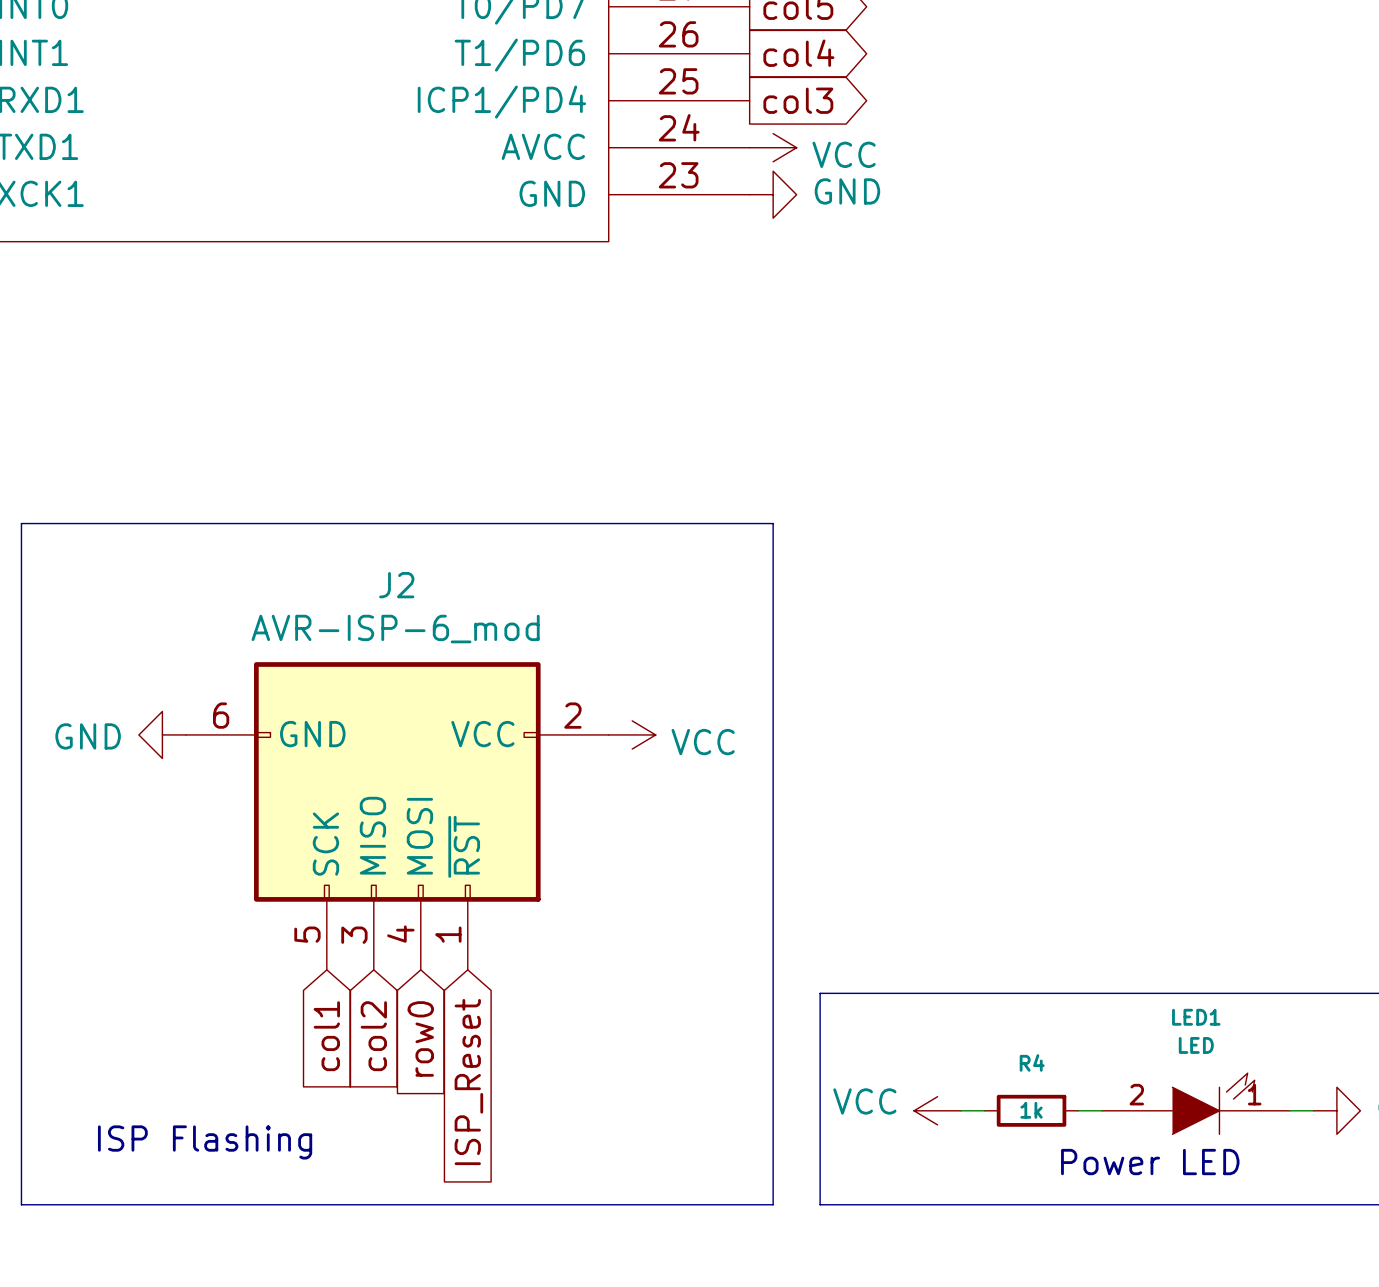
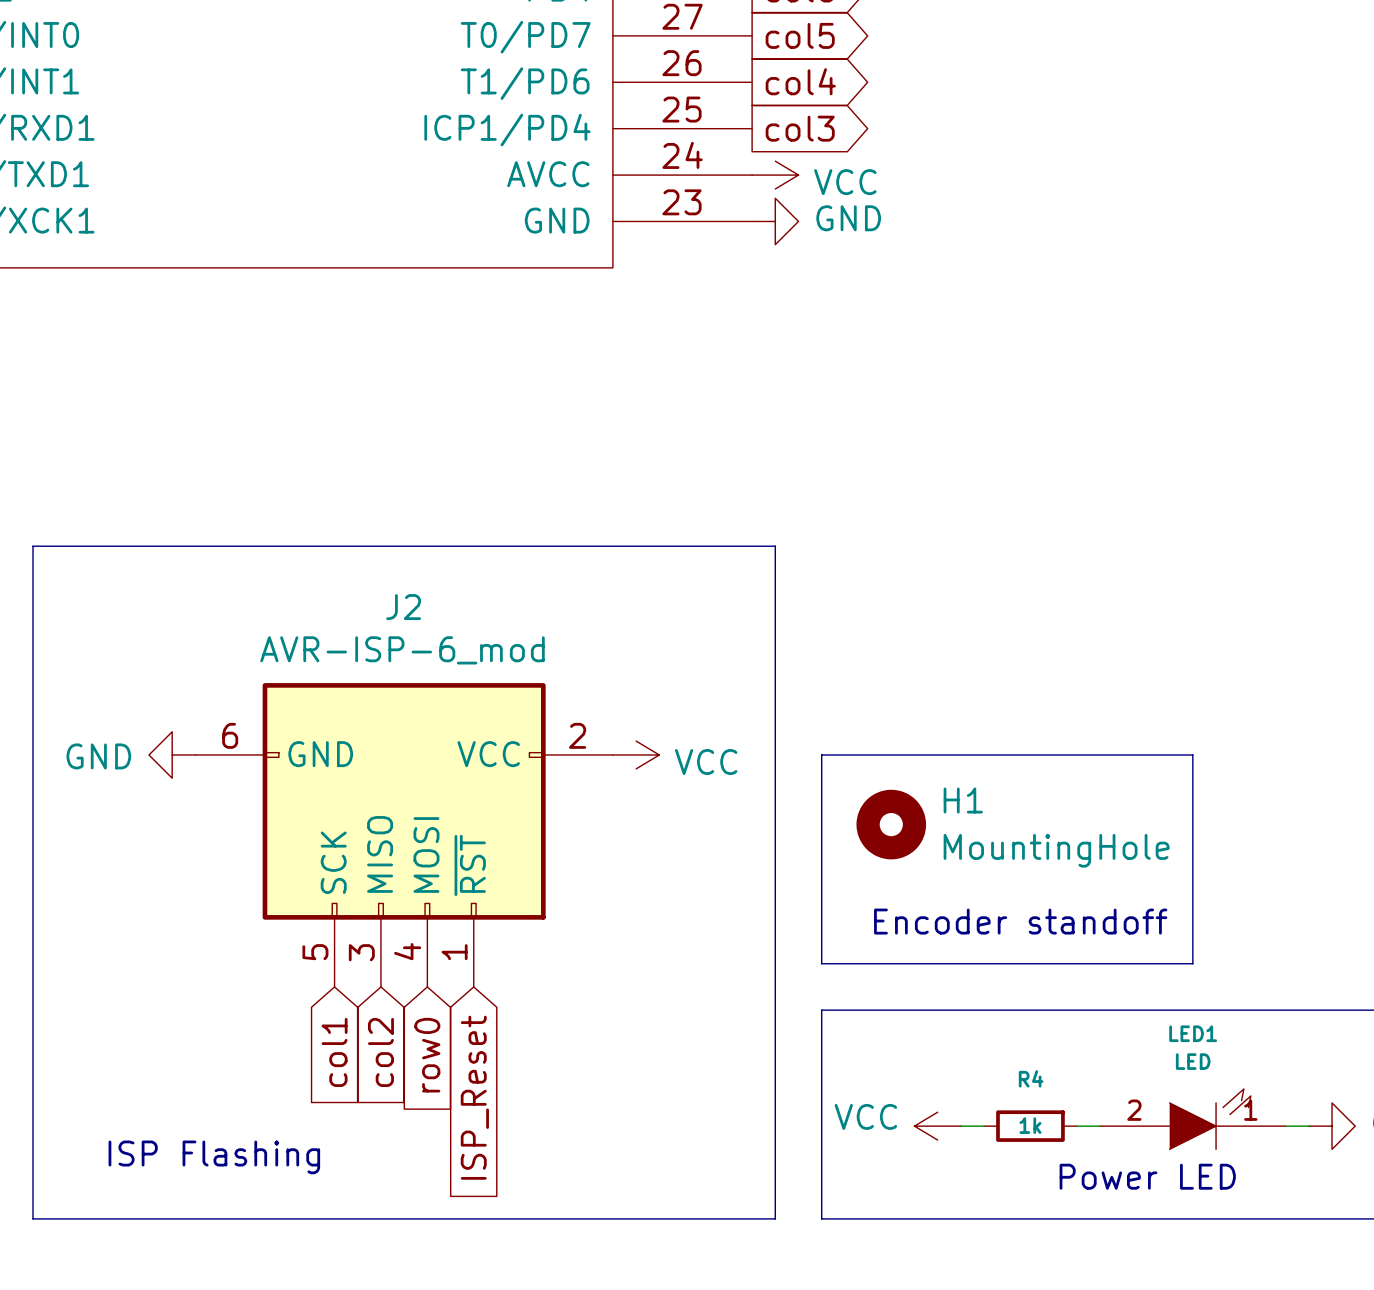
line: none -> (821, 754) (1192, 754) (1192, 963) (821, 963) (821, 754)
H1: none -> MountingHole (891, 824)
text: none -> Encoder standoff (1020, 921)

